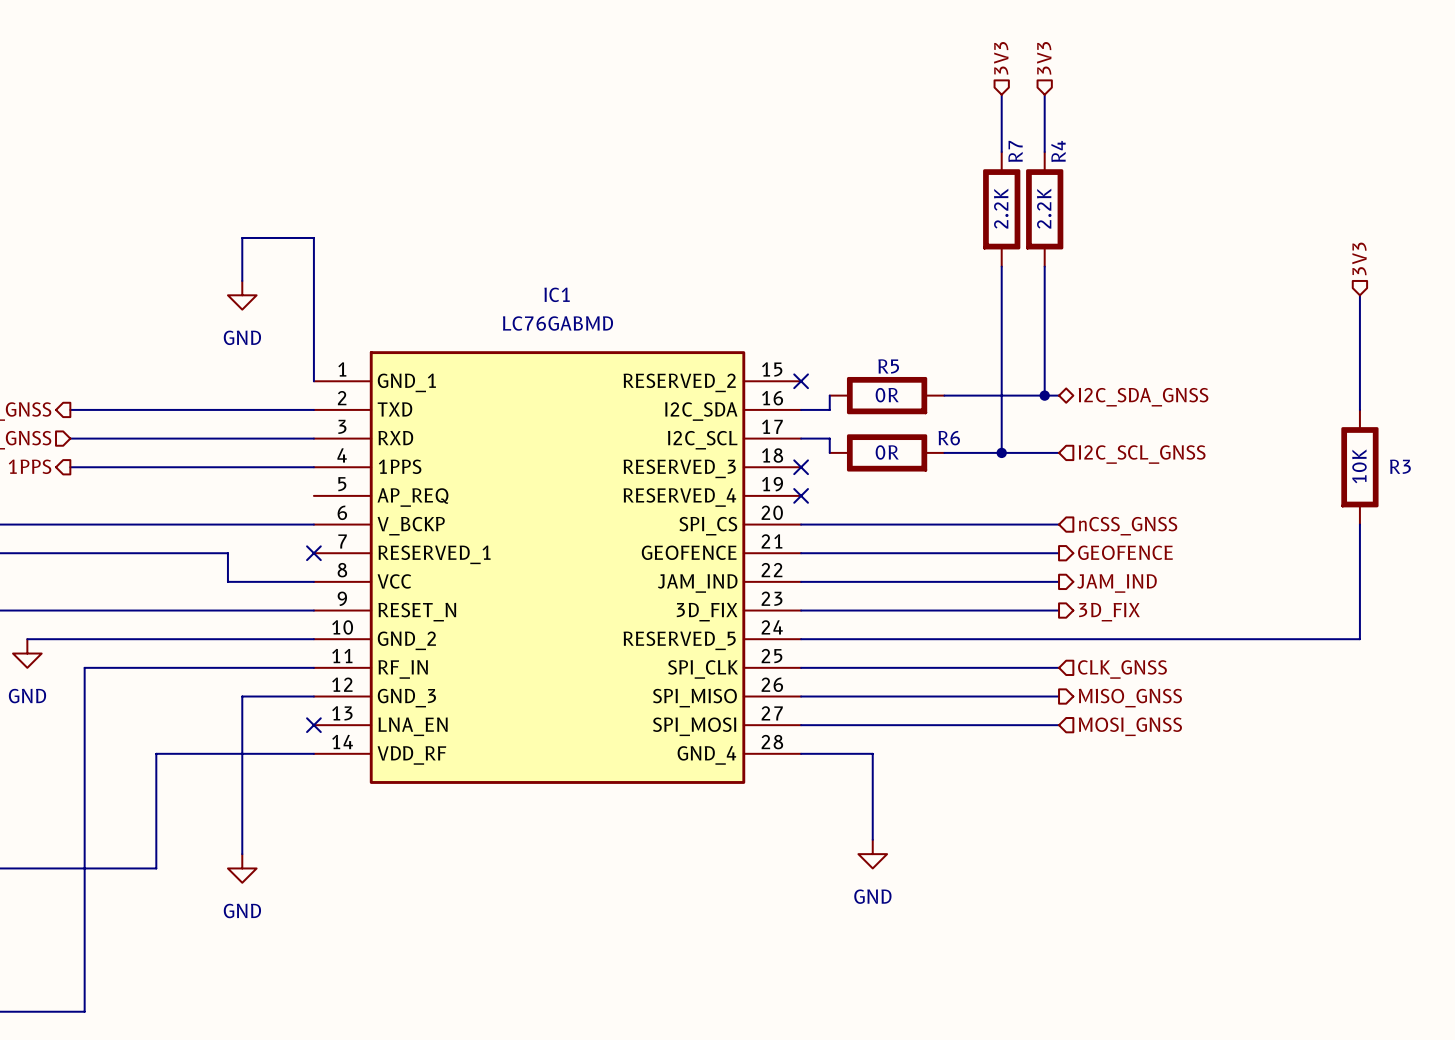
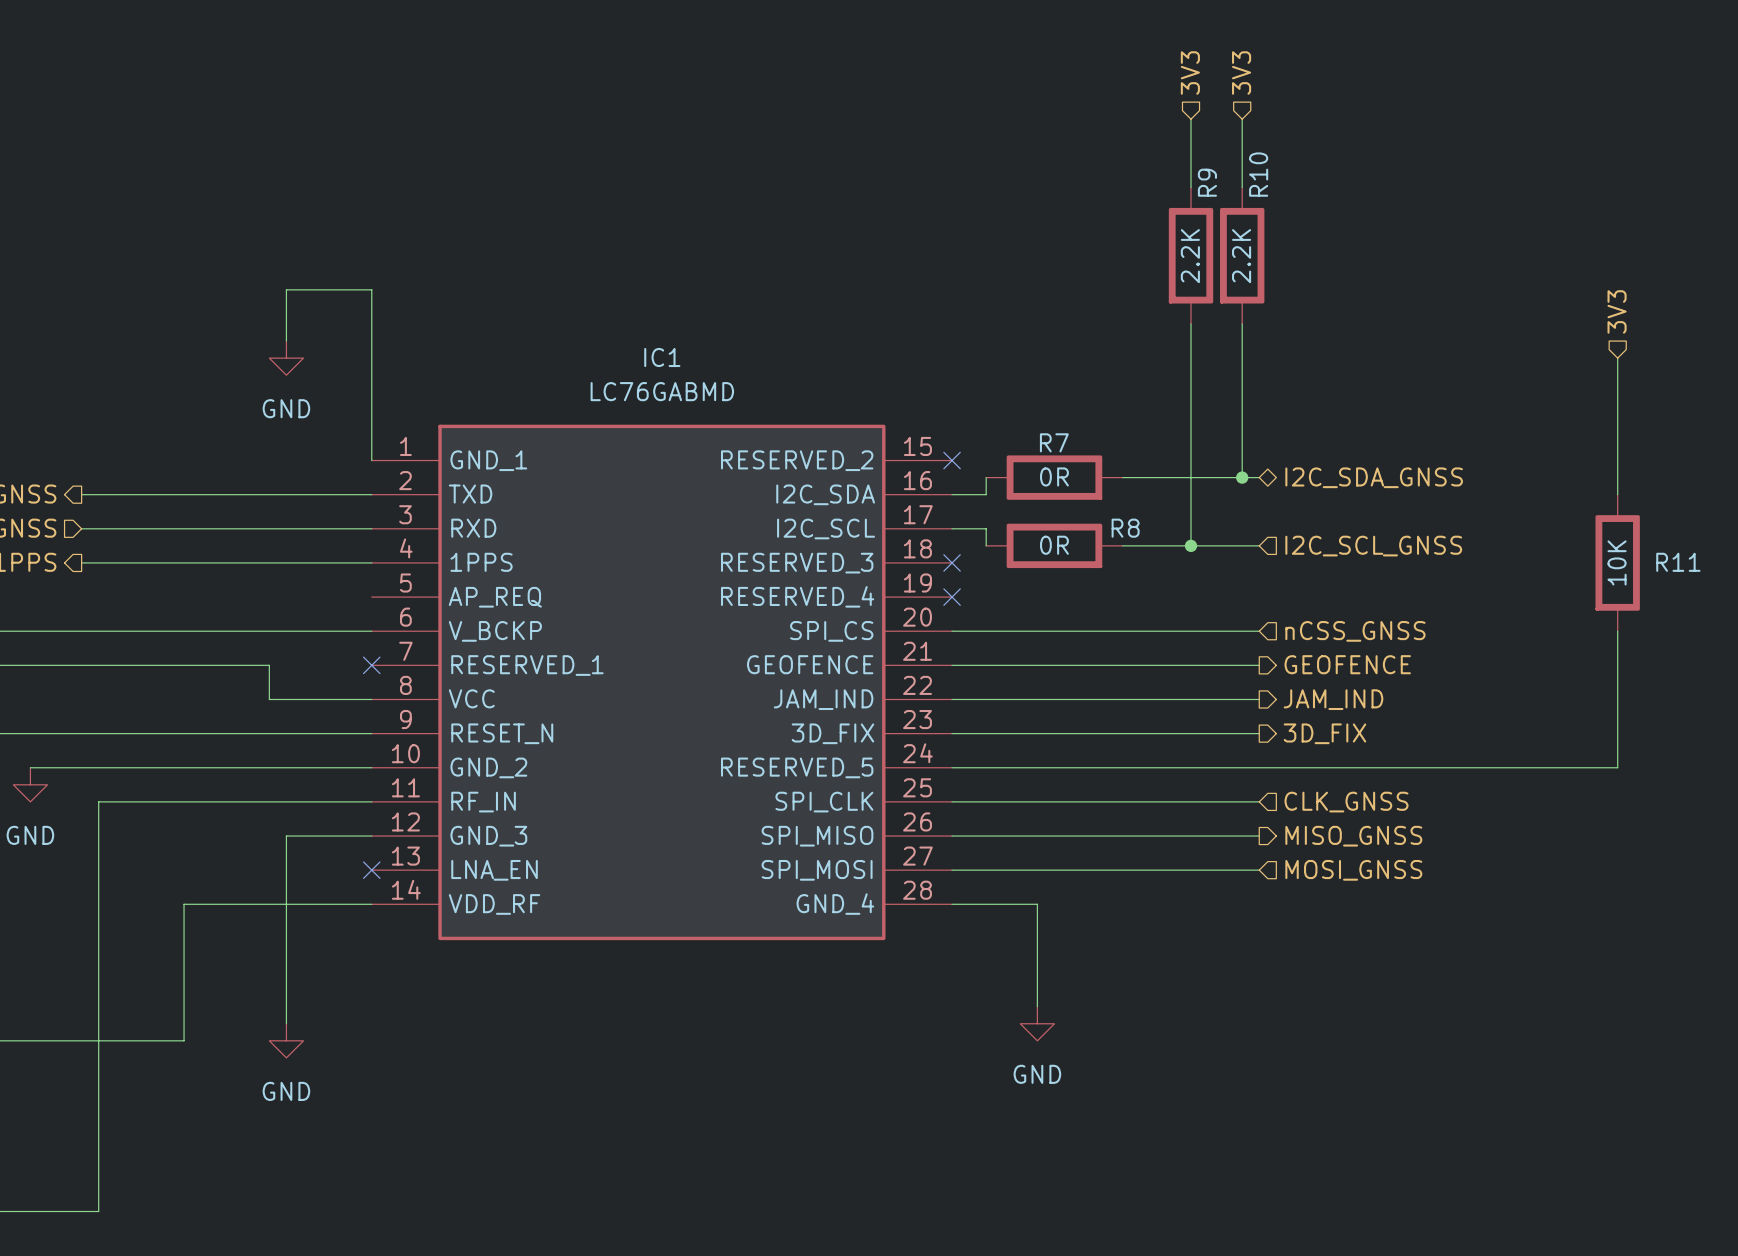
R7 name: R7 (1015, 151) -> R9 (1207, 182)
R4 name: R4 (1058, 151) -> R10 (1258, 174)
R5 name: R5 (888, 366) -> R7 (1054, 442)
R6 name: R6 (949, 438) -> R8 (1125, 528)
R3 name: R3 (1400, 466) -> R11 (1678, 562)

